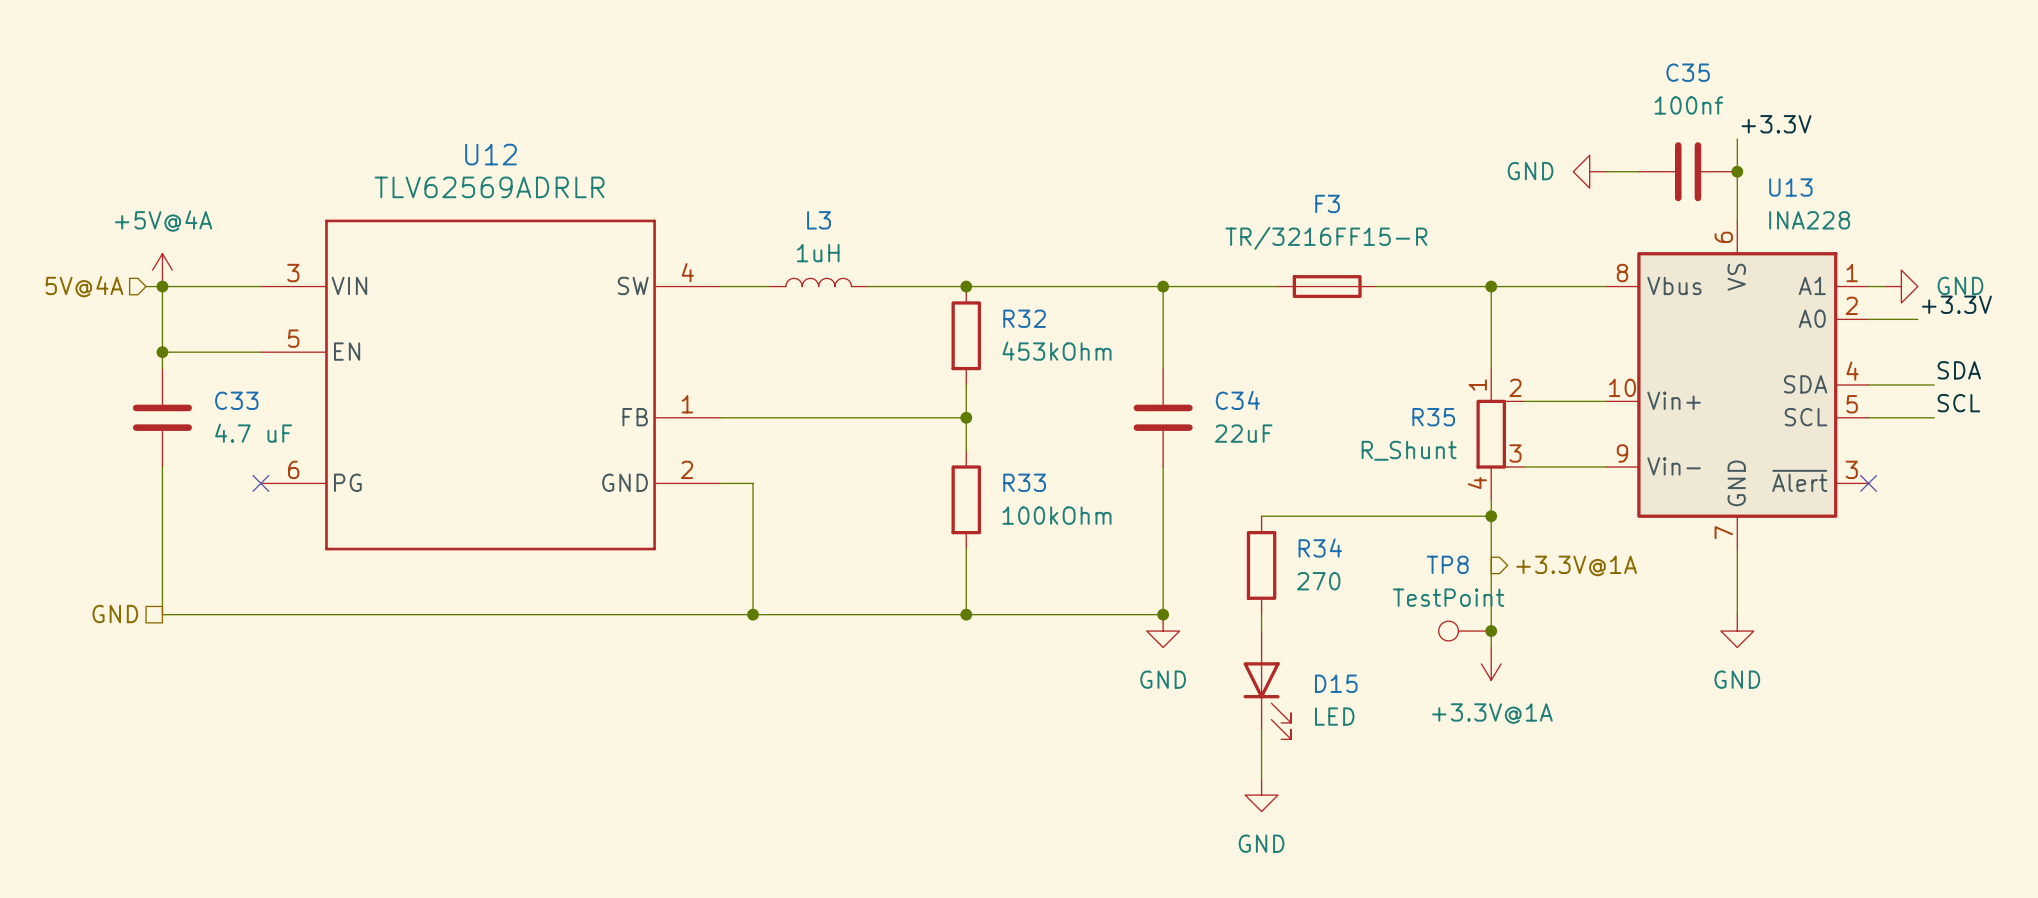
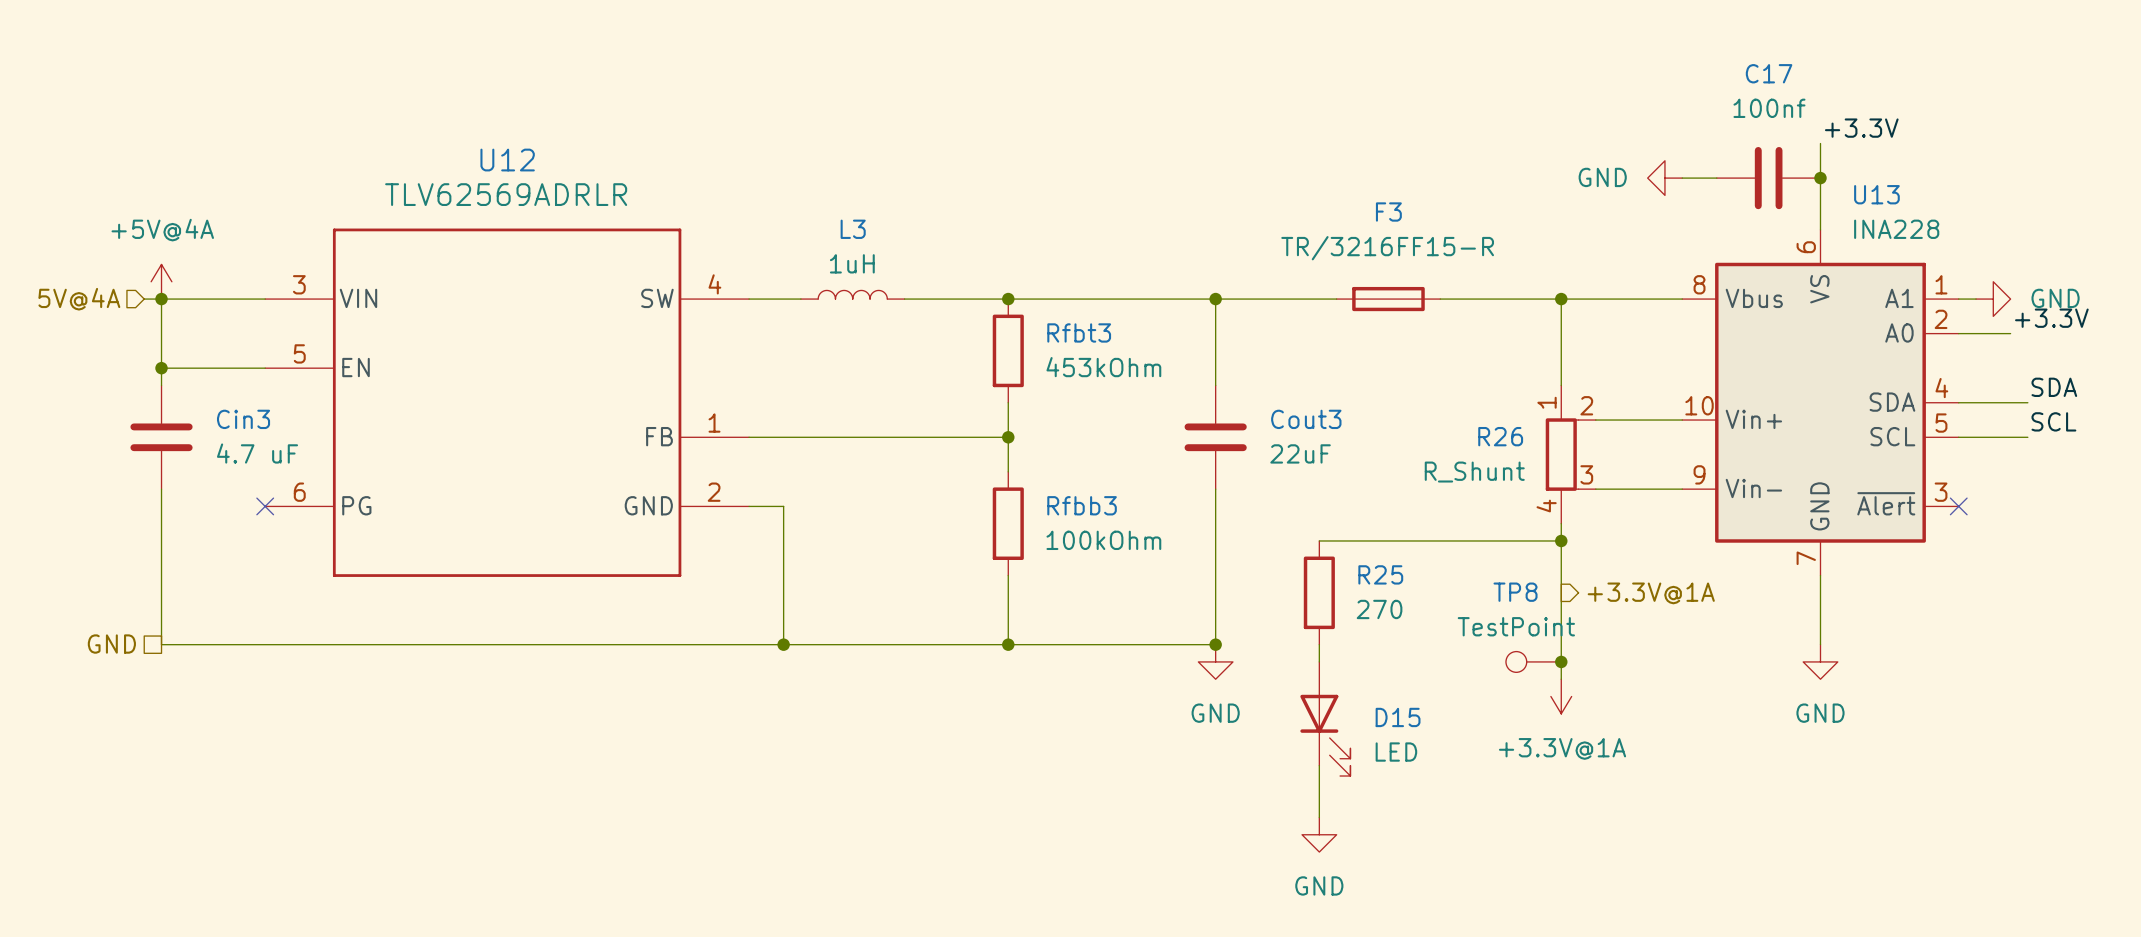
C35 name: C35 (1688, 72) -> C17 (1769, 73)
R32 name: R32 (1024, 318) -> Rfbt3 (1079, 332)
C33 name: C33 (236, 400) -> Cin3 (243, 419)
C34 name: C34 (1237, 400) -> Cout3 (1306, 419)
R35 name: R35 (1433, 417) -> R26 (1500, 436)
R33 name: R33 (1024, 482) -> Rfbb3 (1082, 505)
R34 name: R34 (1320, 548) -> R25 (1380, 574)

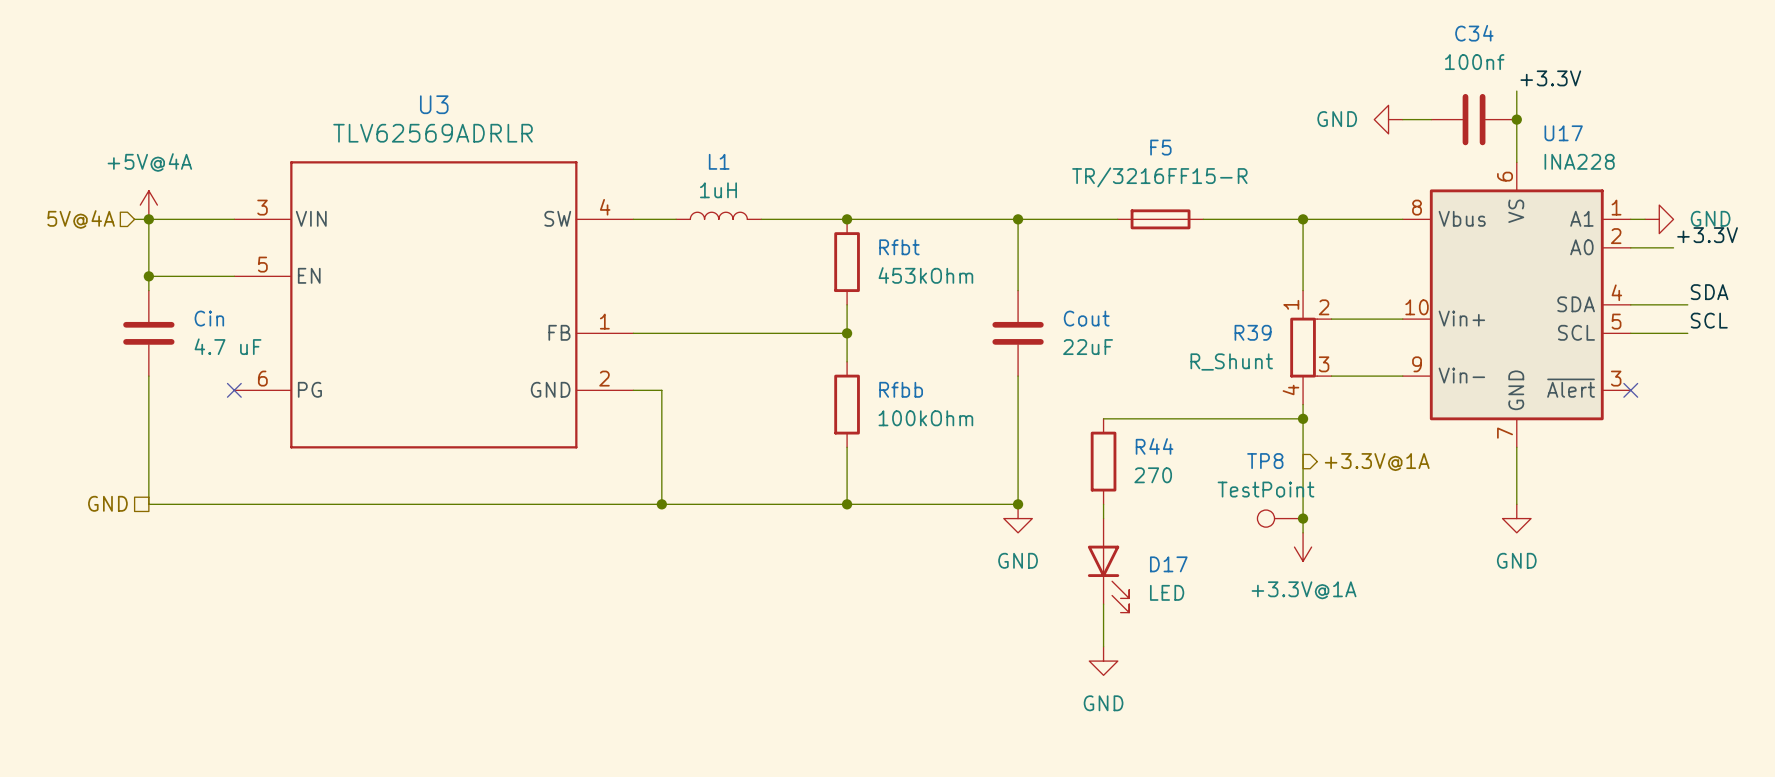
C17 name: C17 (1769, 73) -> C34 (1474, 33)
U12 name: U12 (507, 160) -> U3 (434, 104)
U13 name: U13 (1876, 194) -> U17 (1563, 133)
F3 name: F3 (1388, 212) -> F5 (1160, 147)
L3 name: L3 (853, 229) -> L1 (719, 161)
Rfbt3 name: Rfbt3 (1079, 332) -> Rfbt (899, 247)
Cin3 name: Cin3 (243, 419) -> Cin (209, 318)
Cout3 name: Cout3 (1306, 419) -> Cout (1086, 318)
R26 name: R26 (1500, 436) -> R39 (1253, 332)
Rfbb3 name: Rfbb3 (1082, 505) -> Rfbb (901, 389)
R25 name: R25 (1380, 574) -> R44 (1154, 446)
D15 name: D15 (1398, 717) -> D17 (1168, 564)

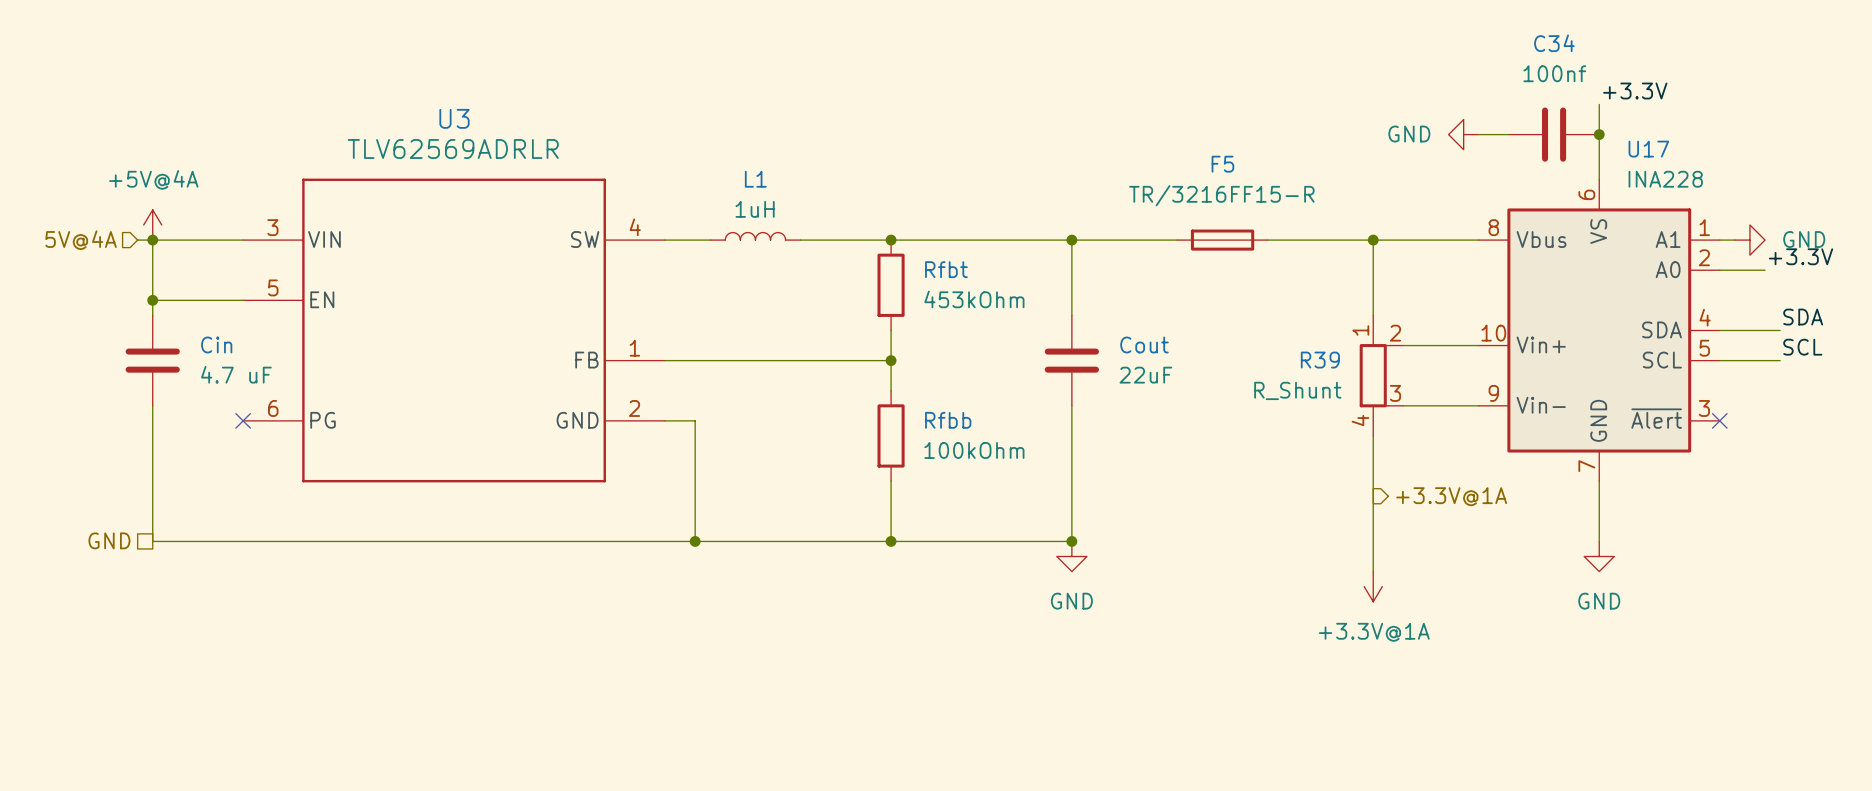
wire: (1103, 418) (1303, 418) -> none
junction: (1303, 418) -> none
R44: 270 (1103, 461) -> none
wire: (1103, 504) (1103, 518) -> none
TP8: TestPoint (1280, 518) -> none
junction: (1303, 518) -> none
D17: LED (1108, 565) -> none
wire: (1103, 604) (1103, 646) -> none
power symbol: GND (1103, 661) -> none

